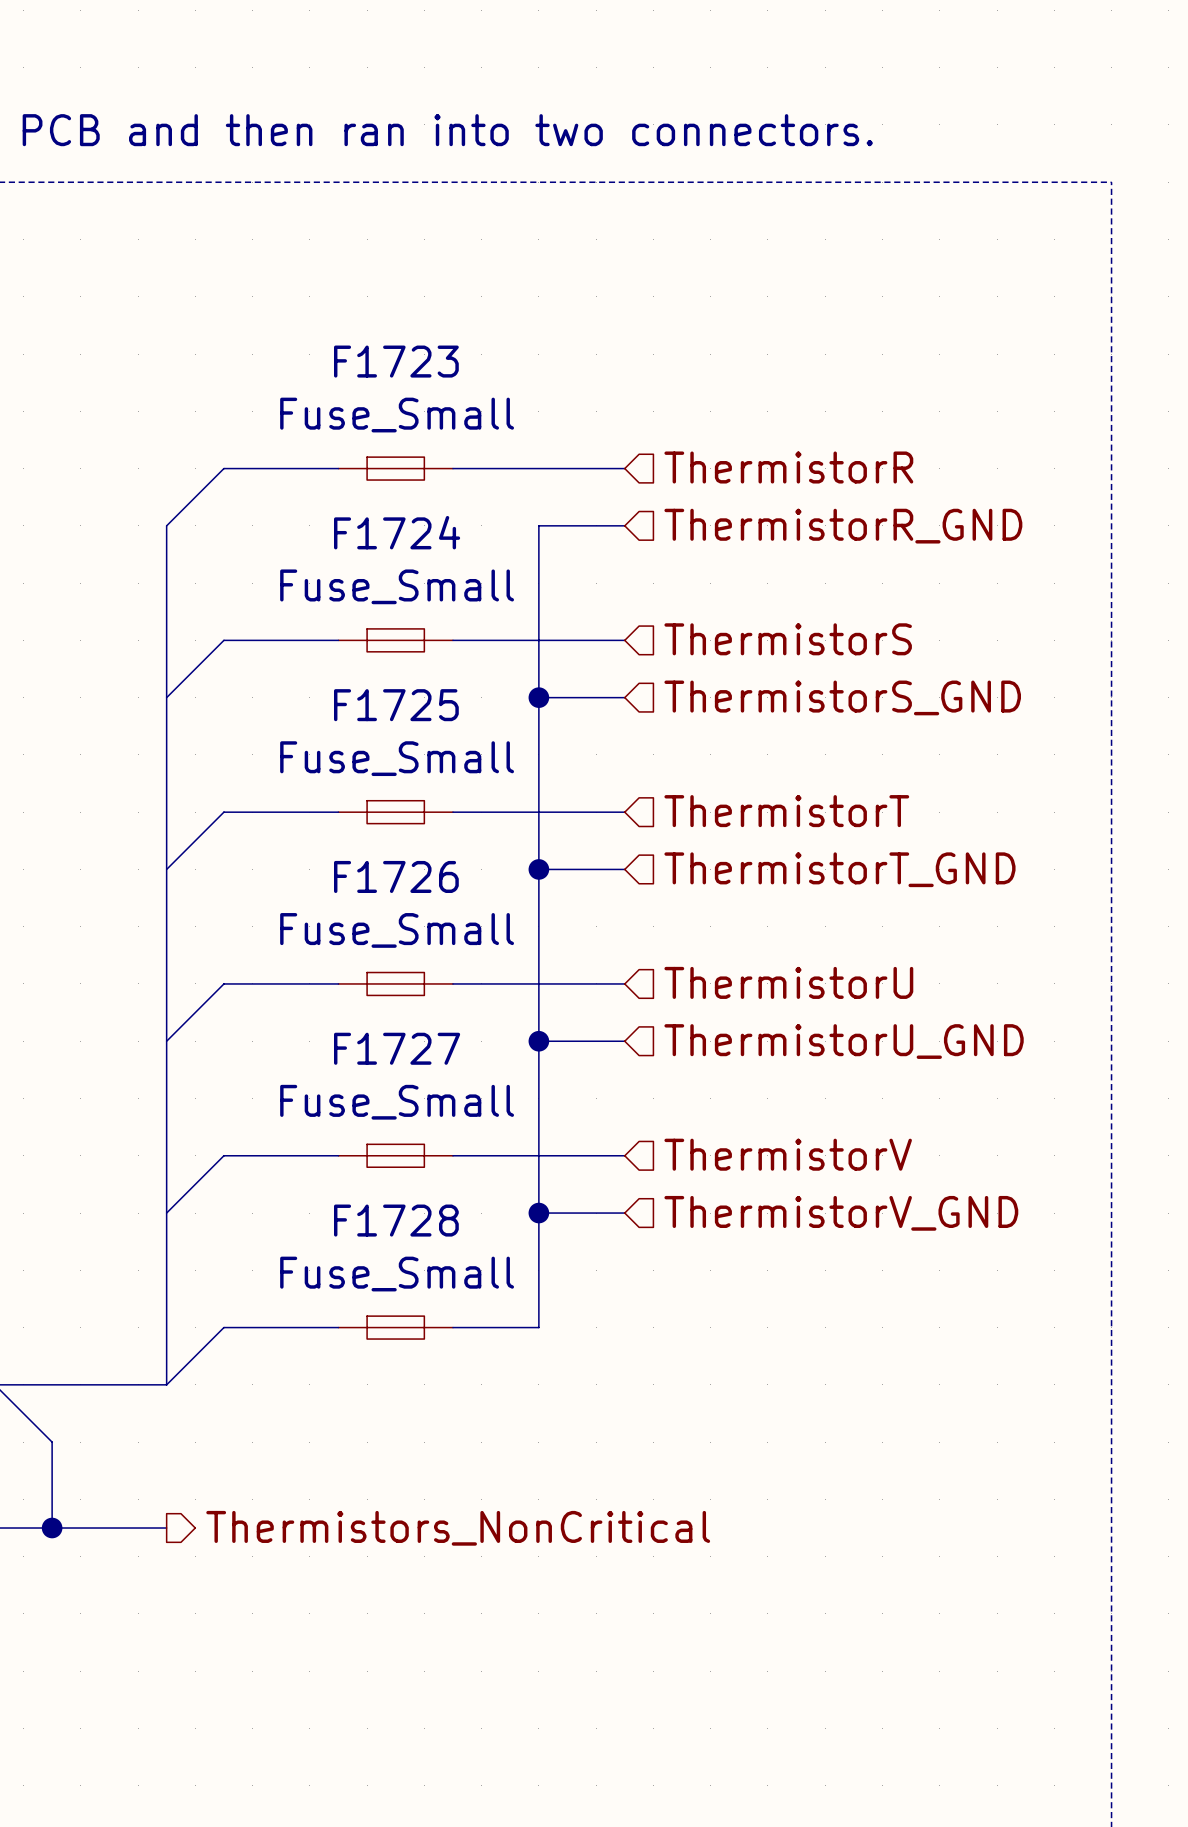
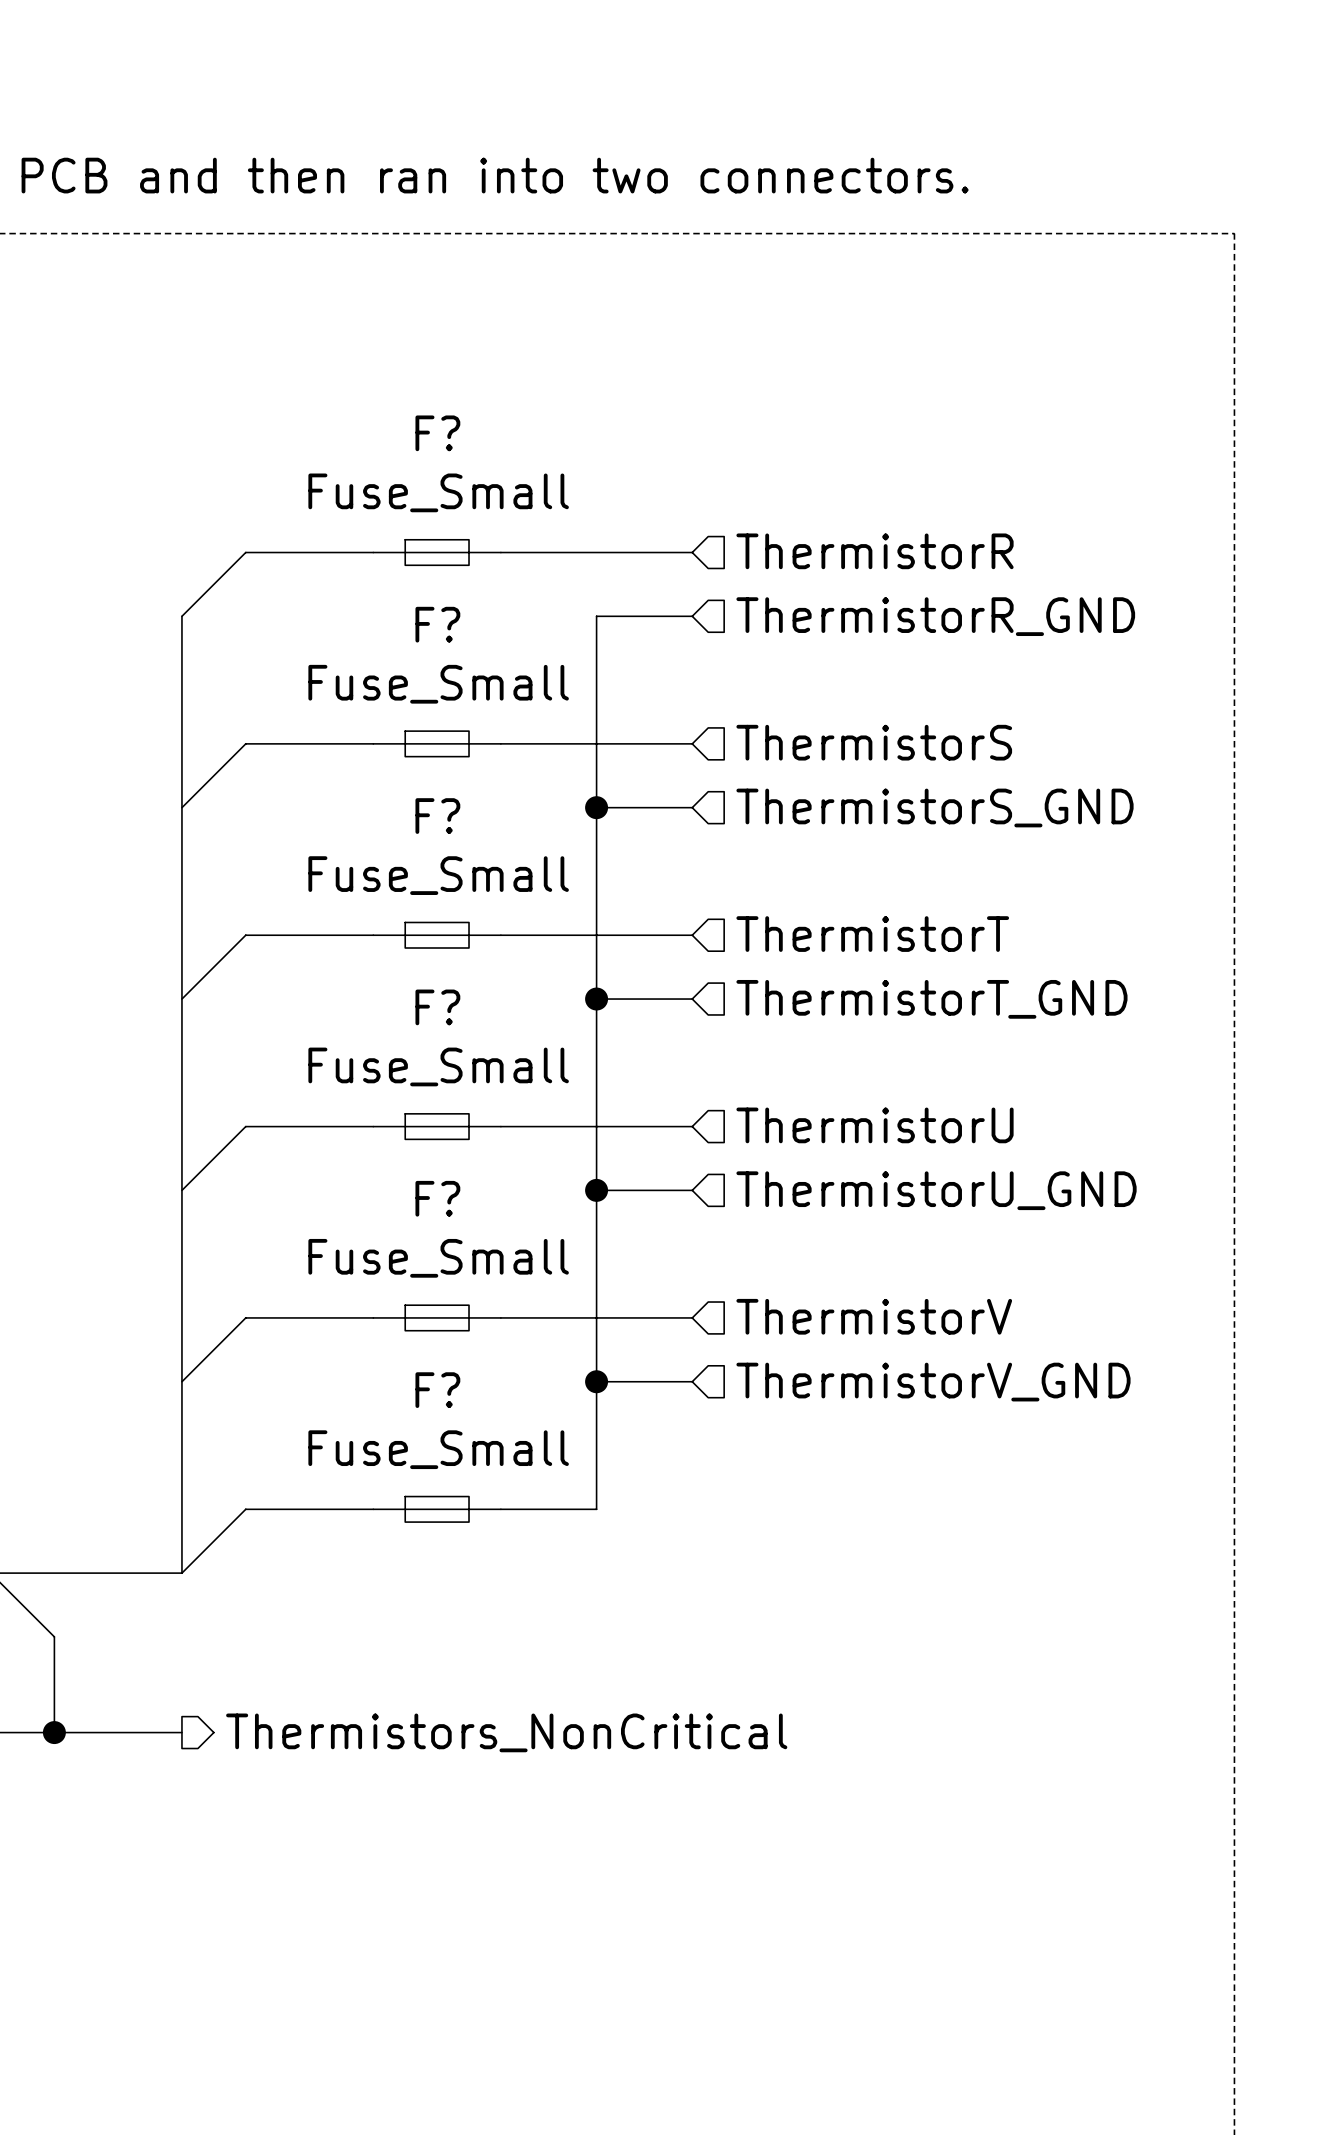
F1723 name: F1723 (396, 361) -> F? (437, 433)
F1724 name: F1724 (397, 532) -> F? (437, 624)
F1725 name: F1725 (396, 705) -> F? (437, 816)
F1726 name: F1726 (396, 876) -> F? (437, 1007)
F1727 name: F1727 (397, 1048) -> F? (437, 1198)
F1728 name: F1728 (396, 1220) -> F? (437, 1390)

